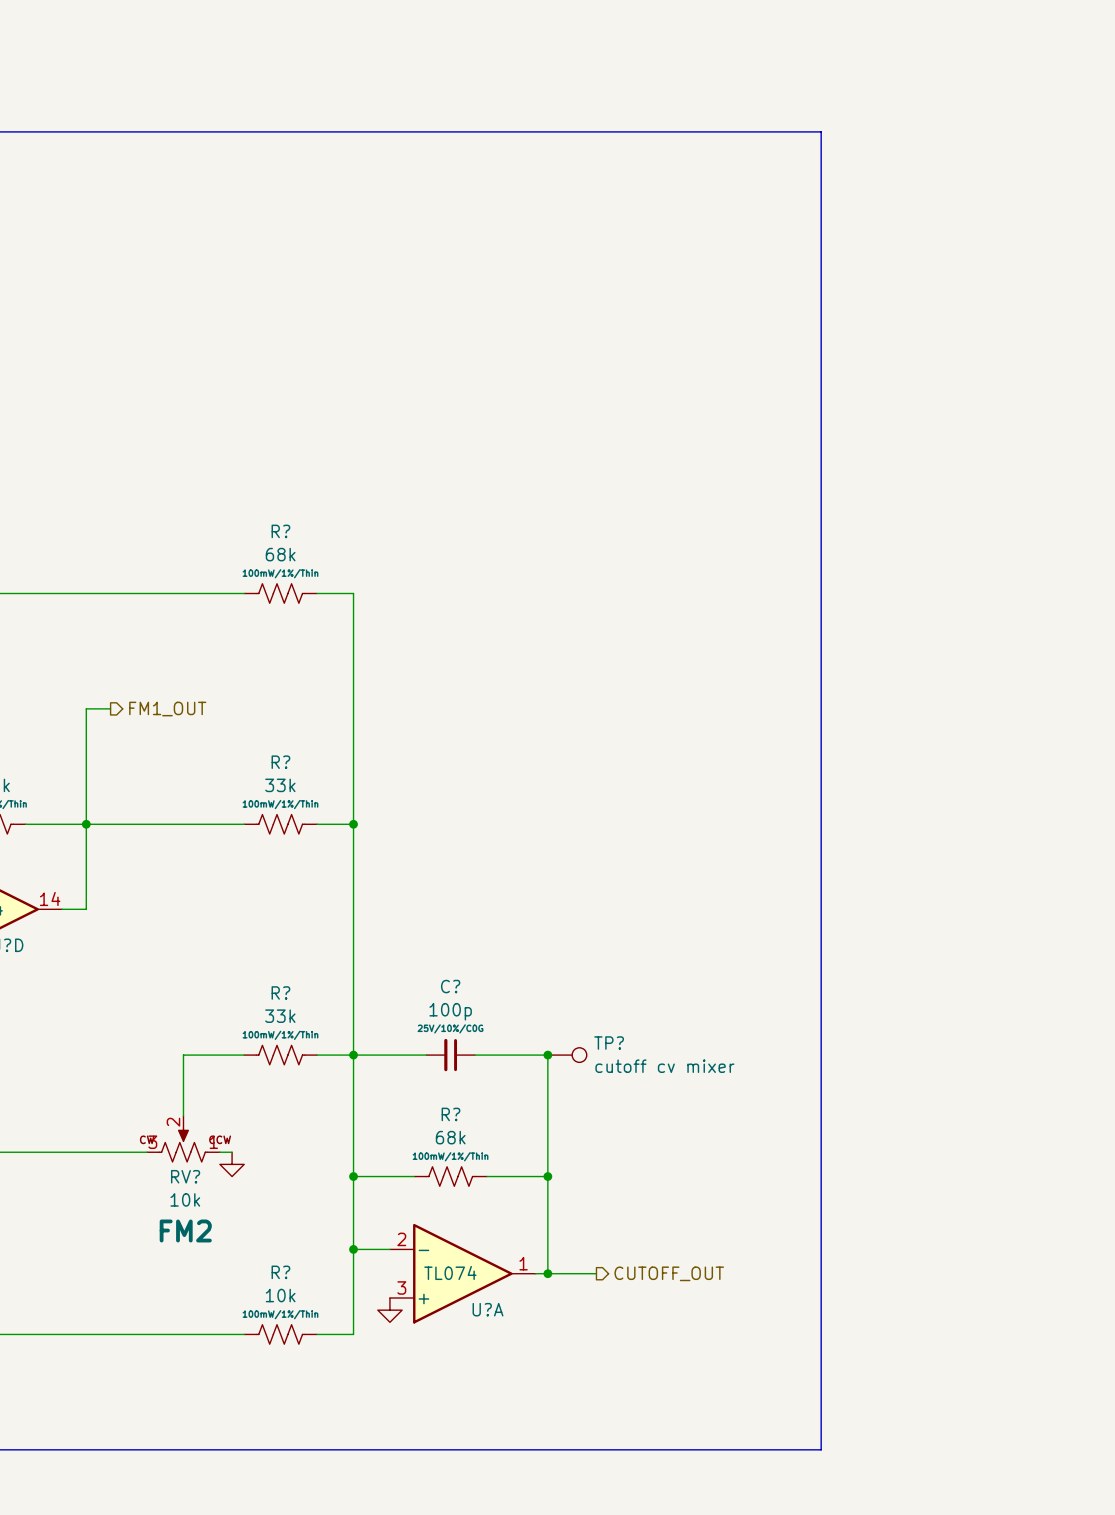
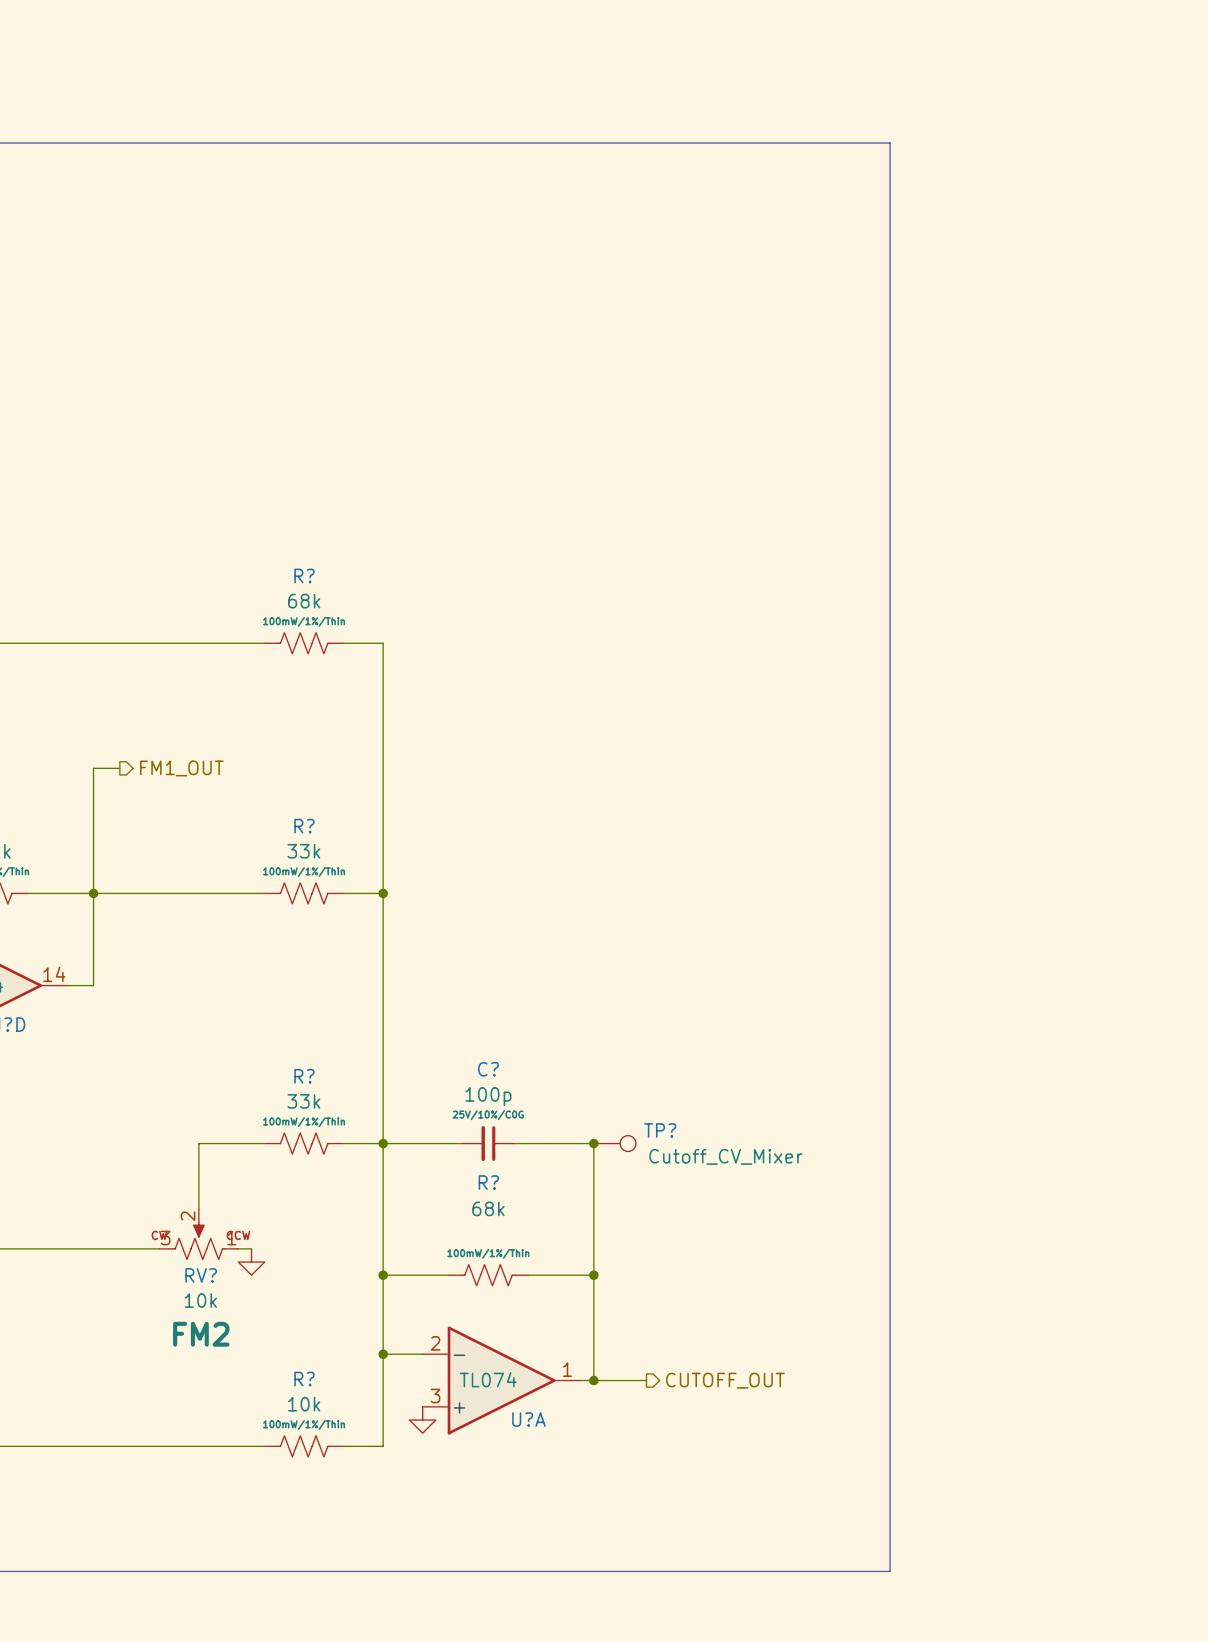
TP? text: cutoff cv mixer (664, 1066) -> Cutoff_CV_Mixer (725, 1156)
R? name position: R? (450, 1114) -> R? (488, 1182)
R? value position: 68k (450, 1137) -> 68k (488, 1208)

